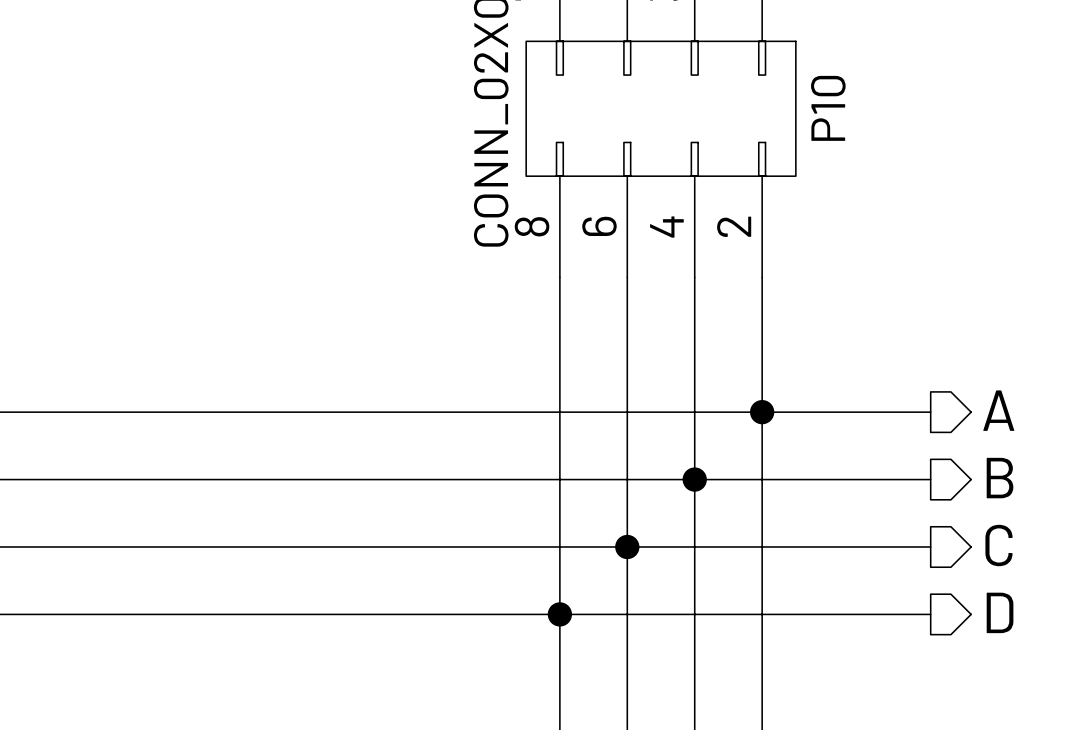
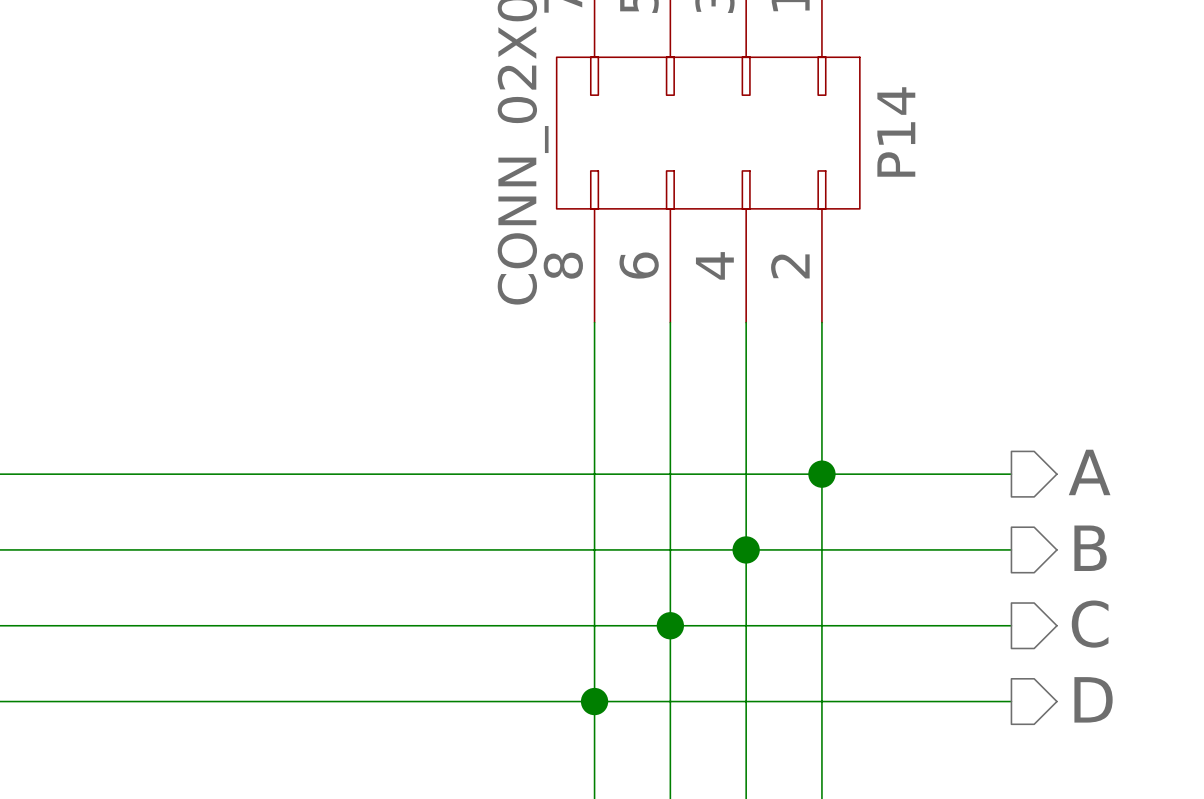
P10 name: P10 (828, 108) -> P14 (896, 131)

